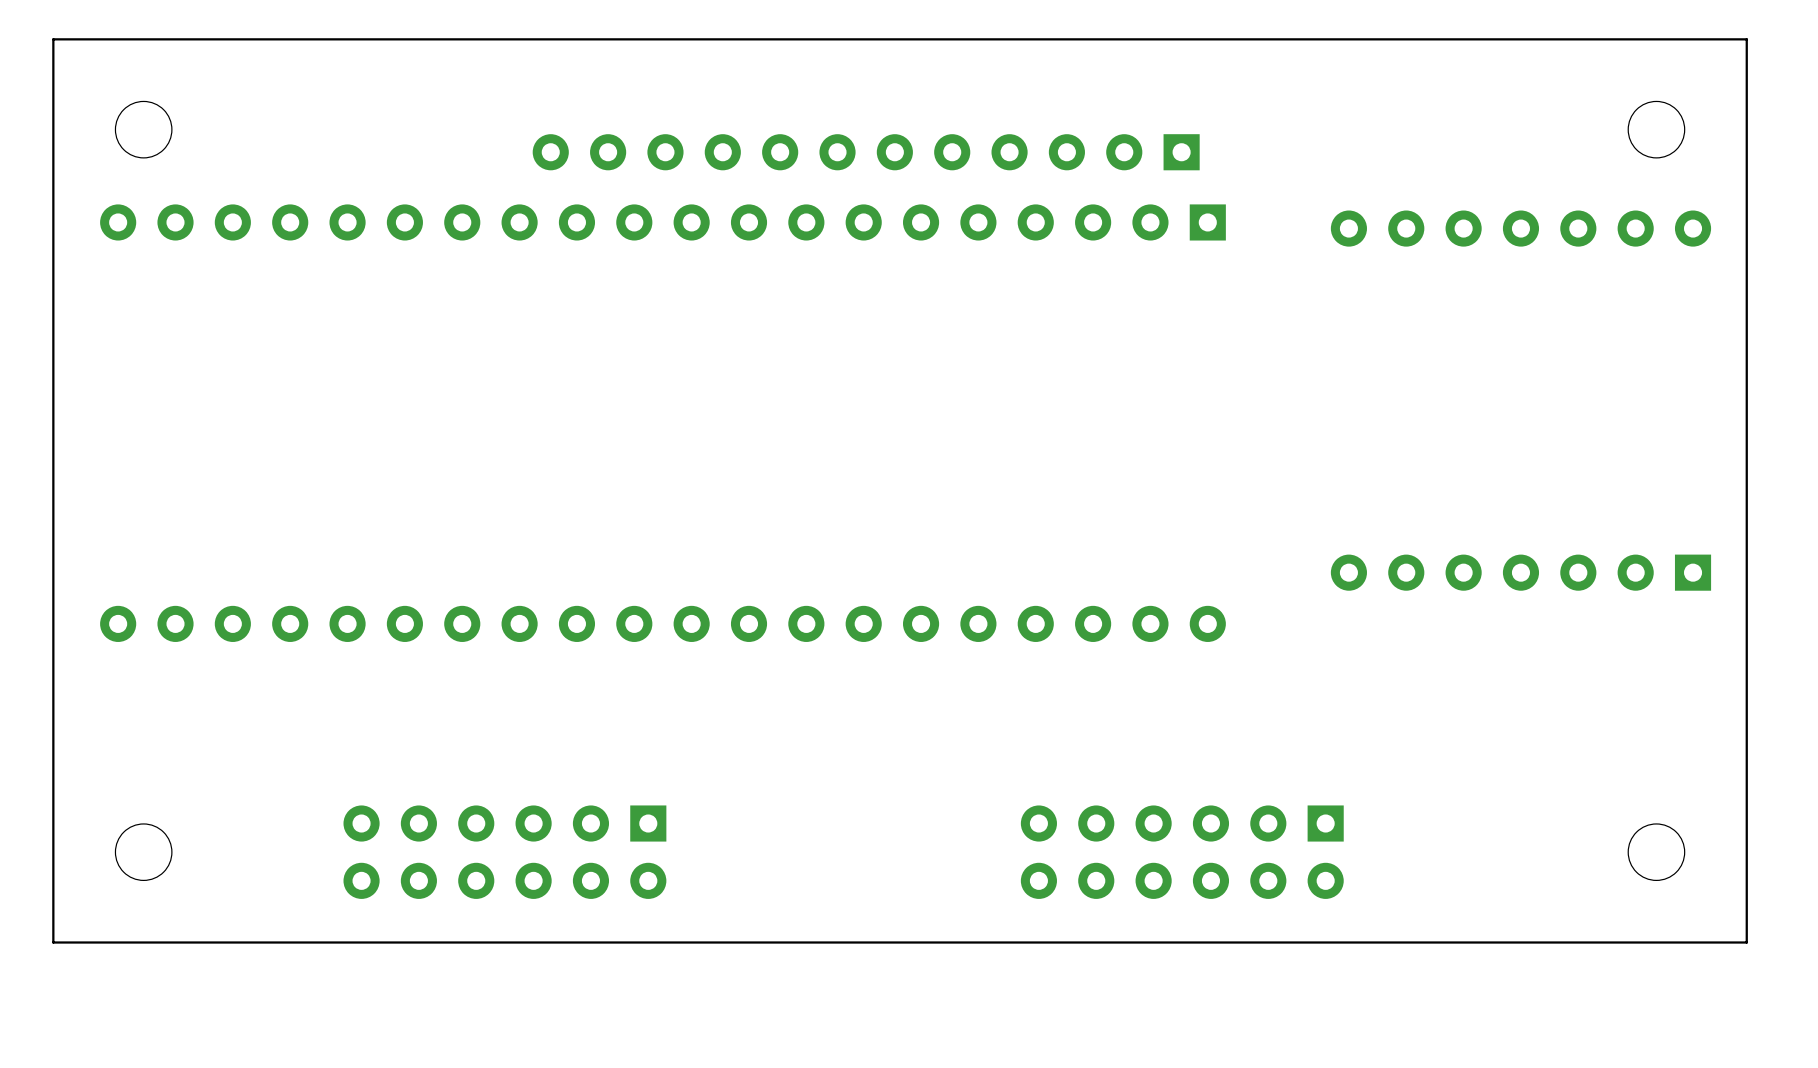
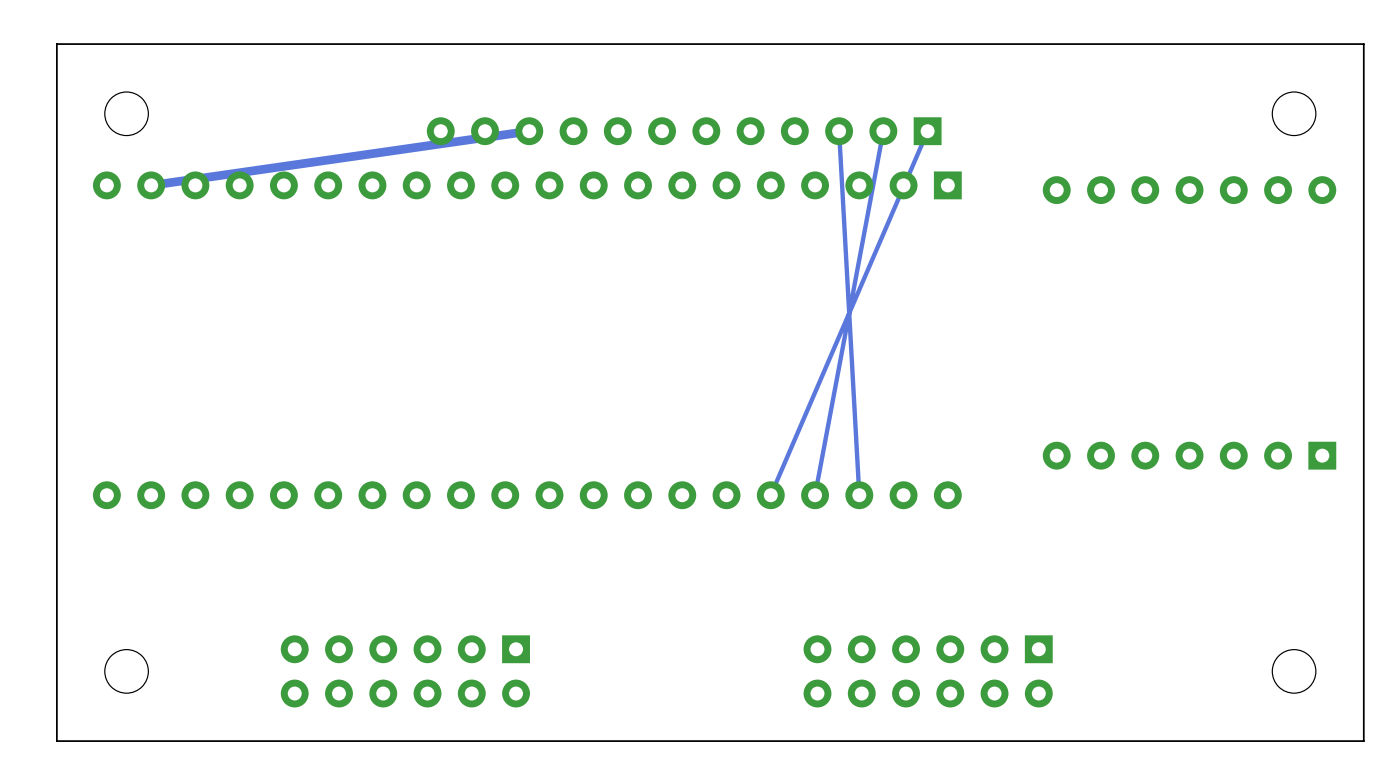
track: none -> (529, 131) (151, 185)
track: none -> (839, 131) (859, 495)
track: none -> (883, 131) (815, 495)
track: none -> (927, 131) (770, 495)

